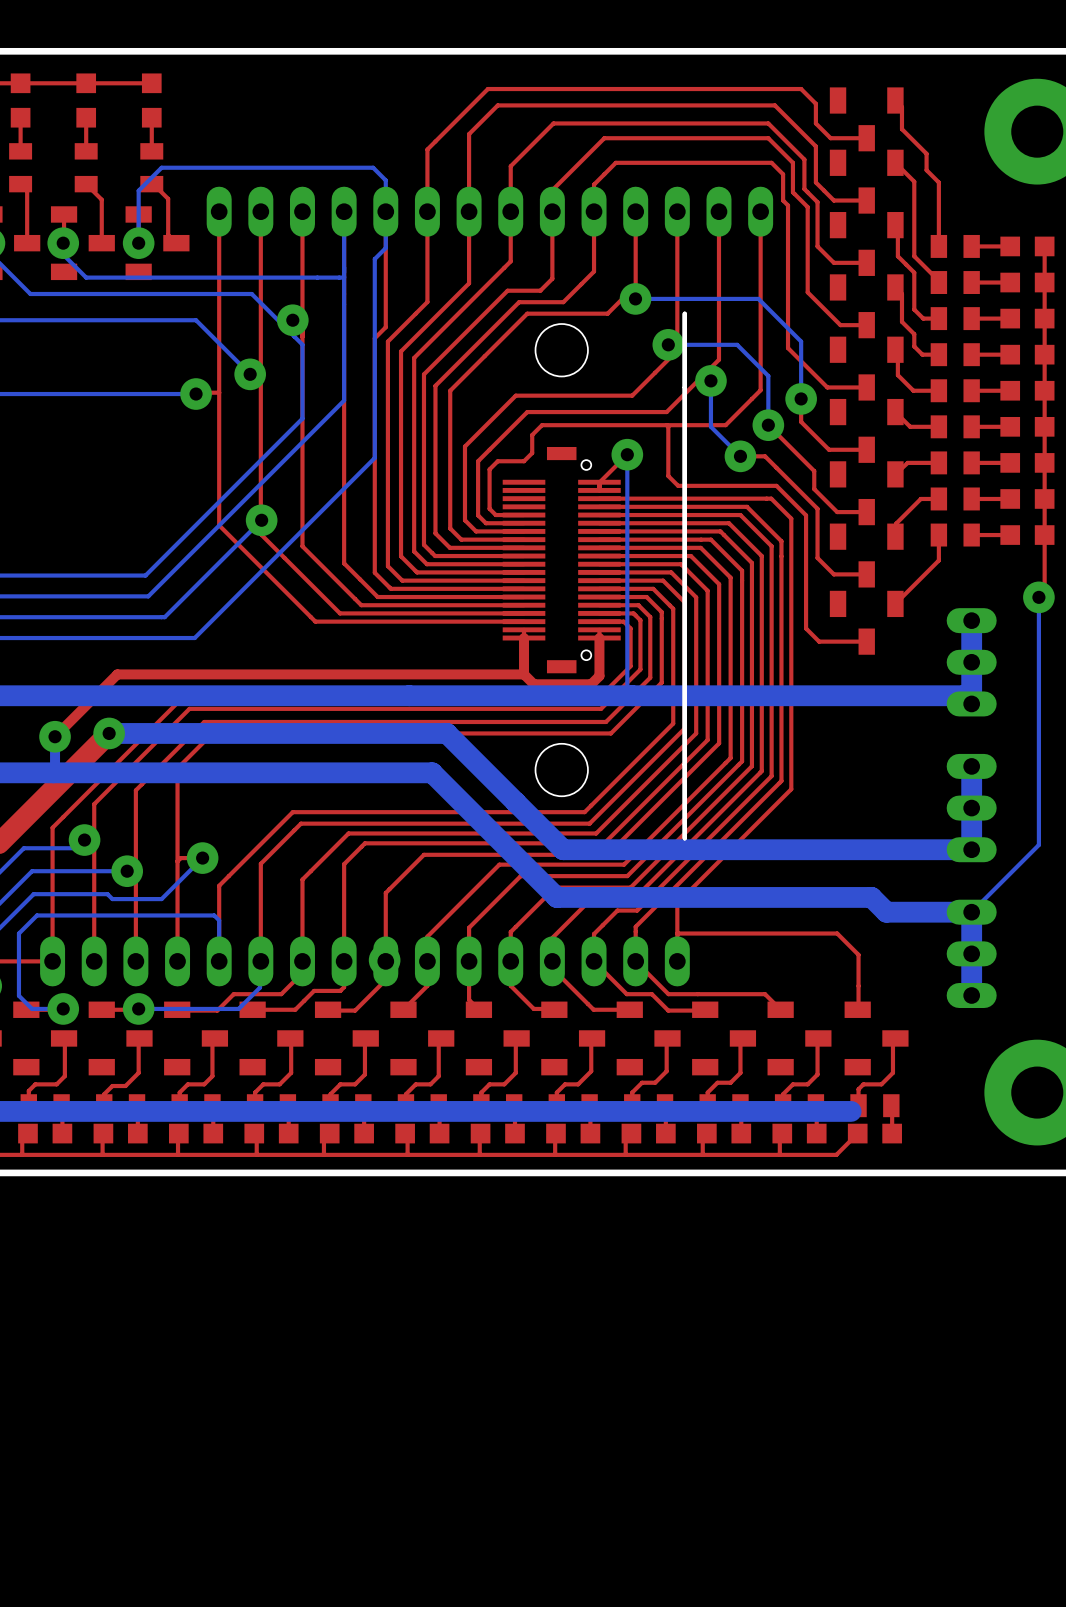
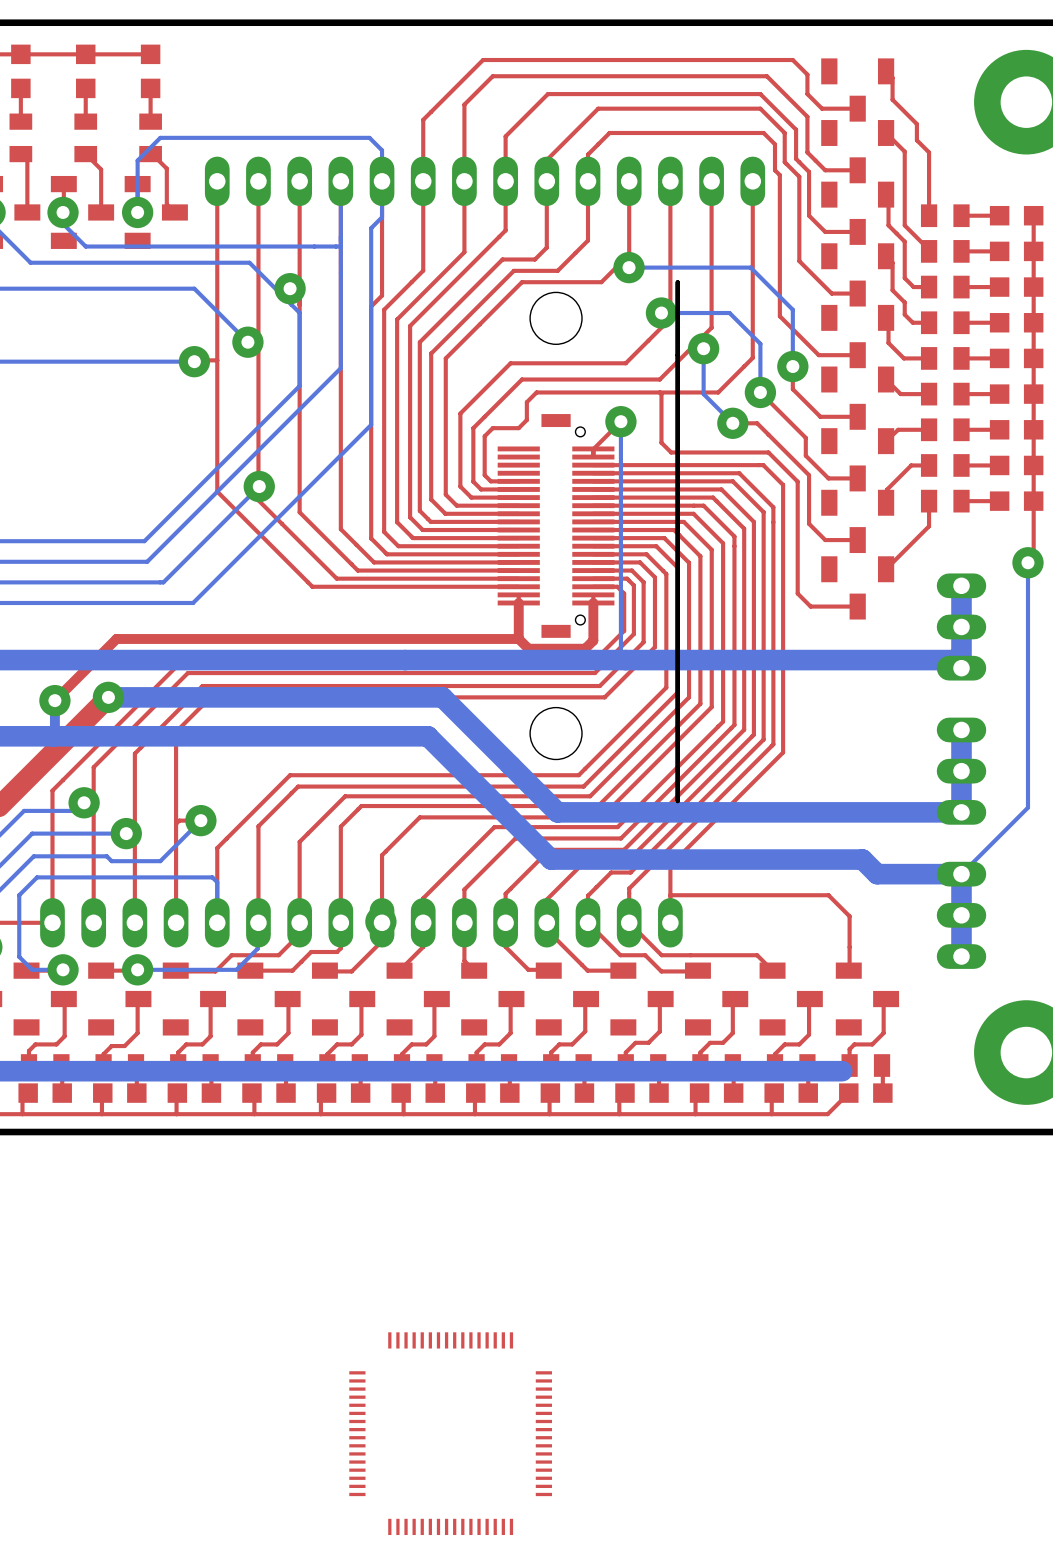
part: none -> (450, 1433)

